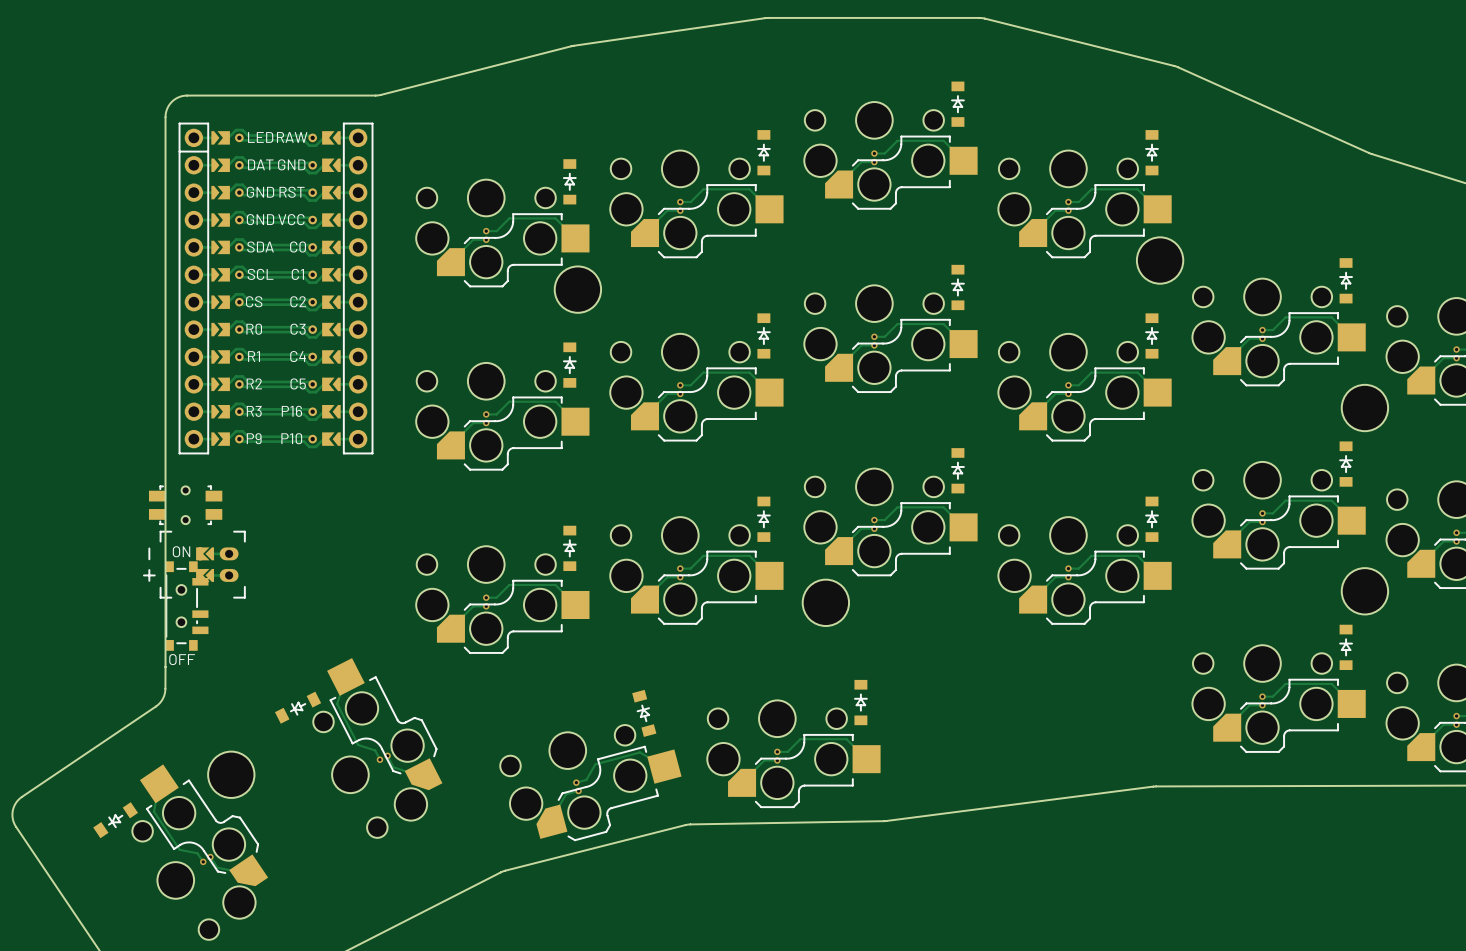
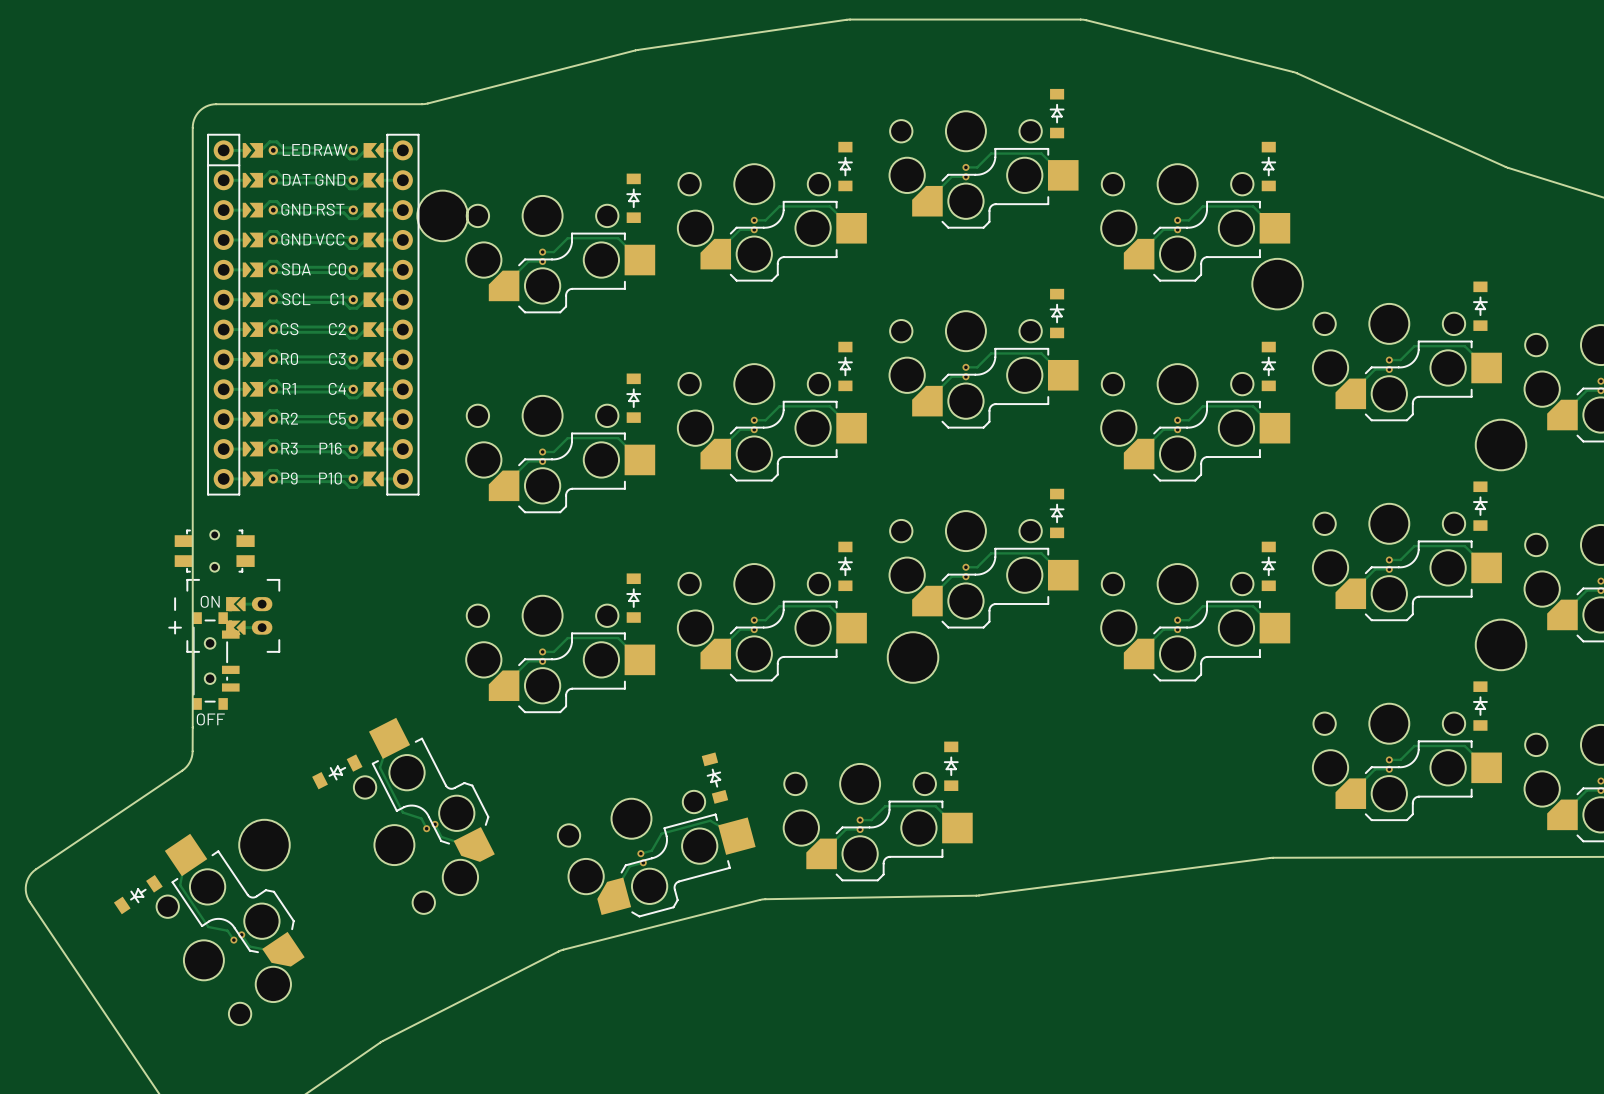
part position: (577, 289) -> (442, 215)

